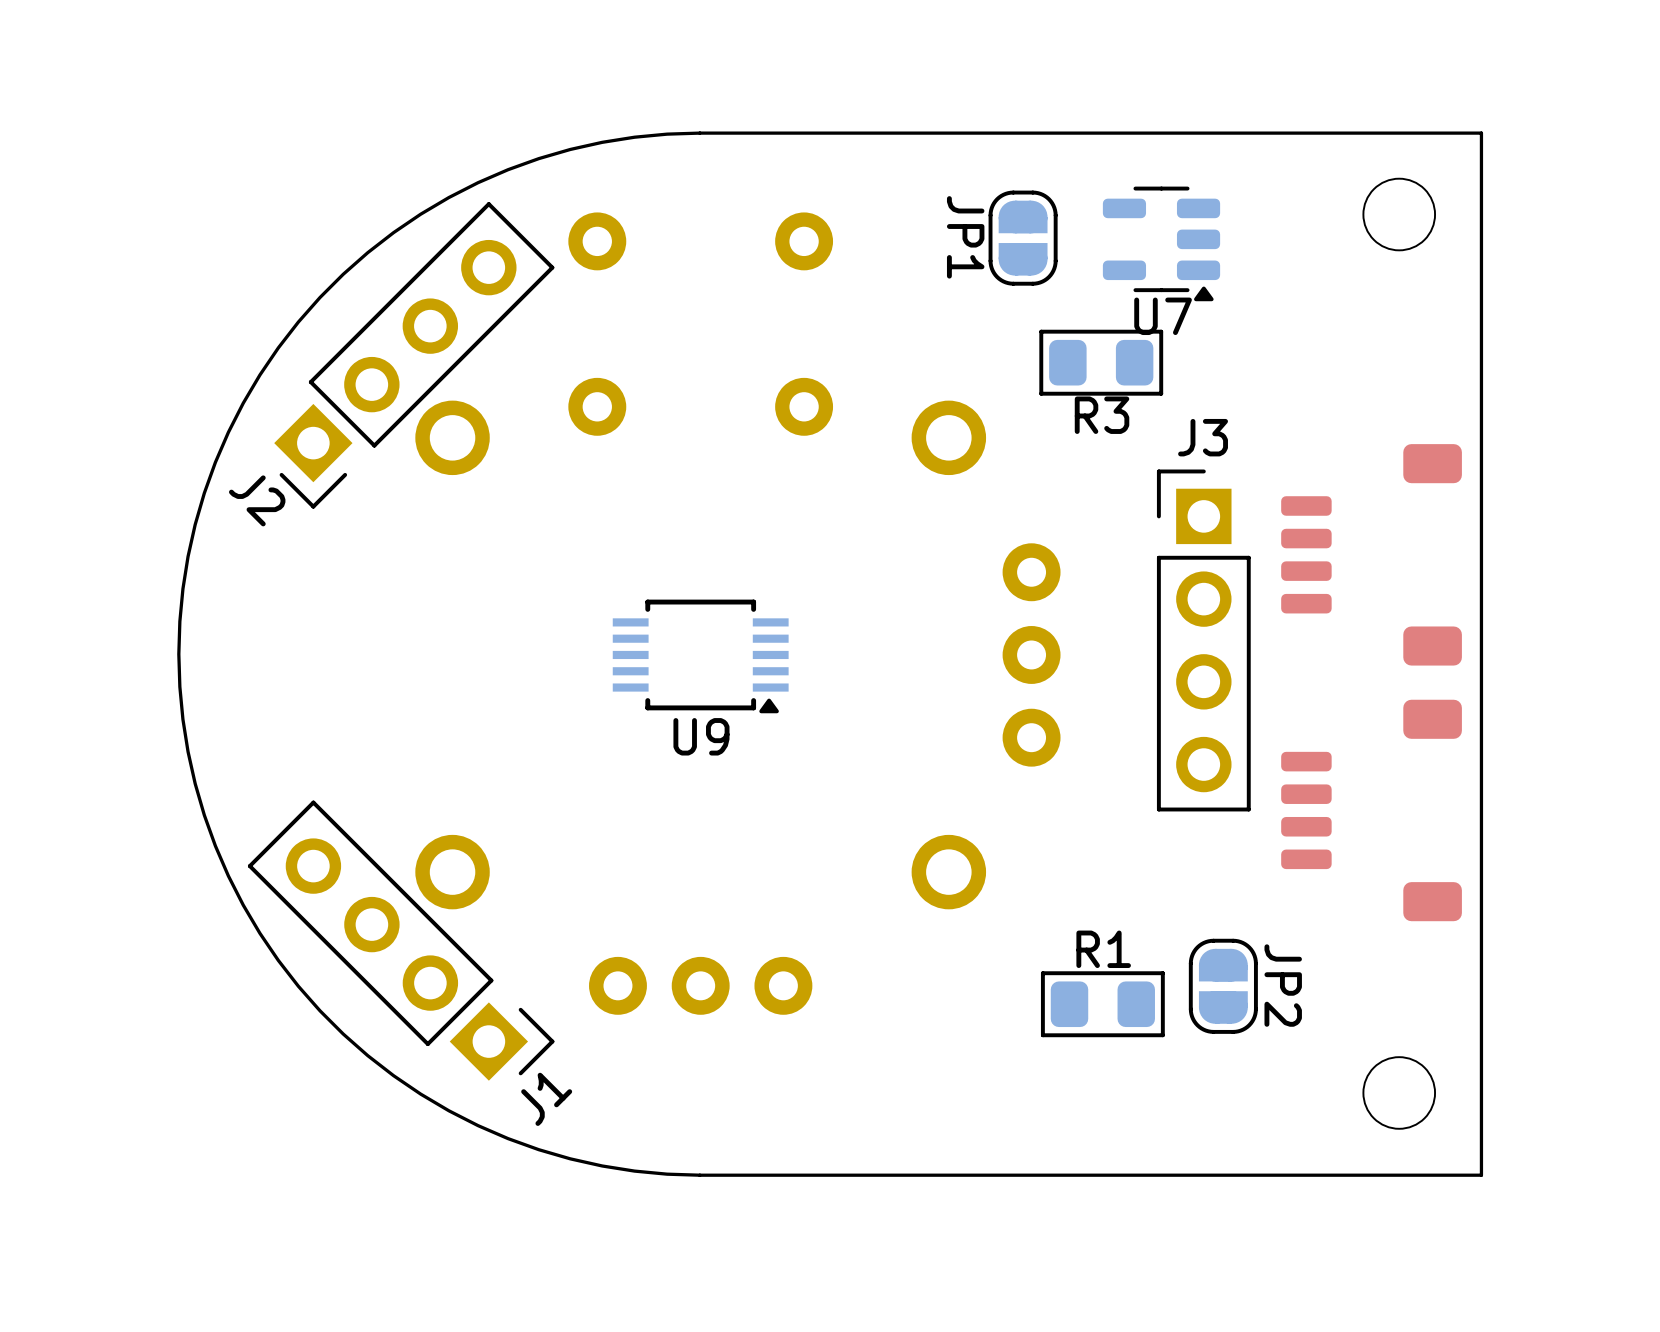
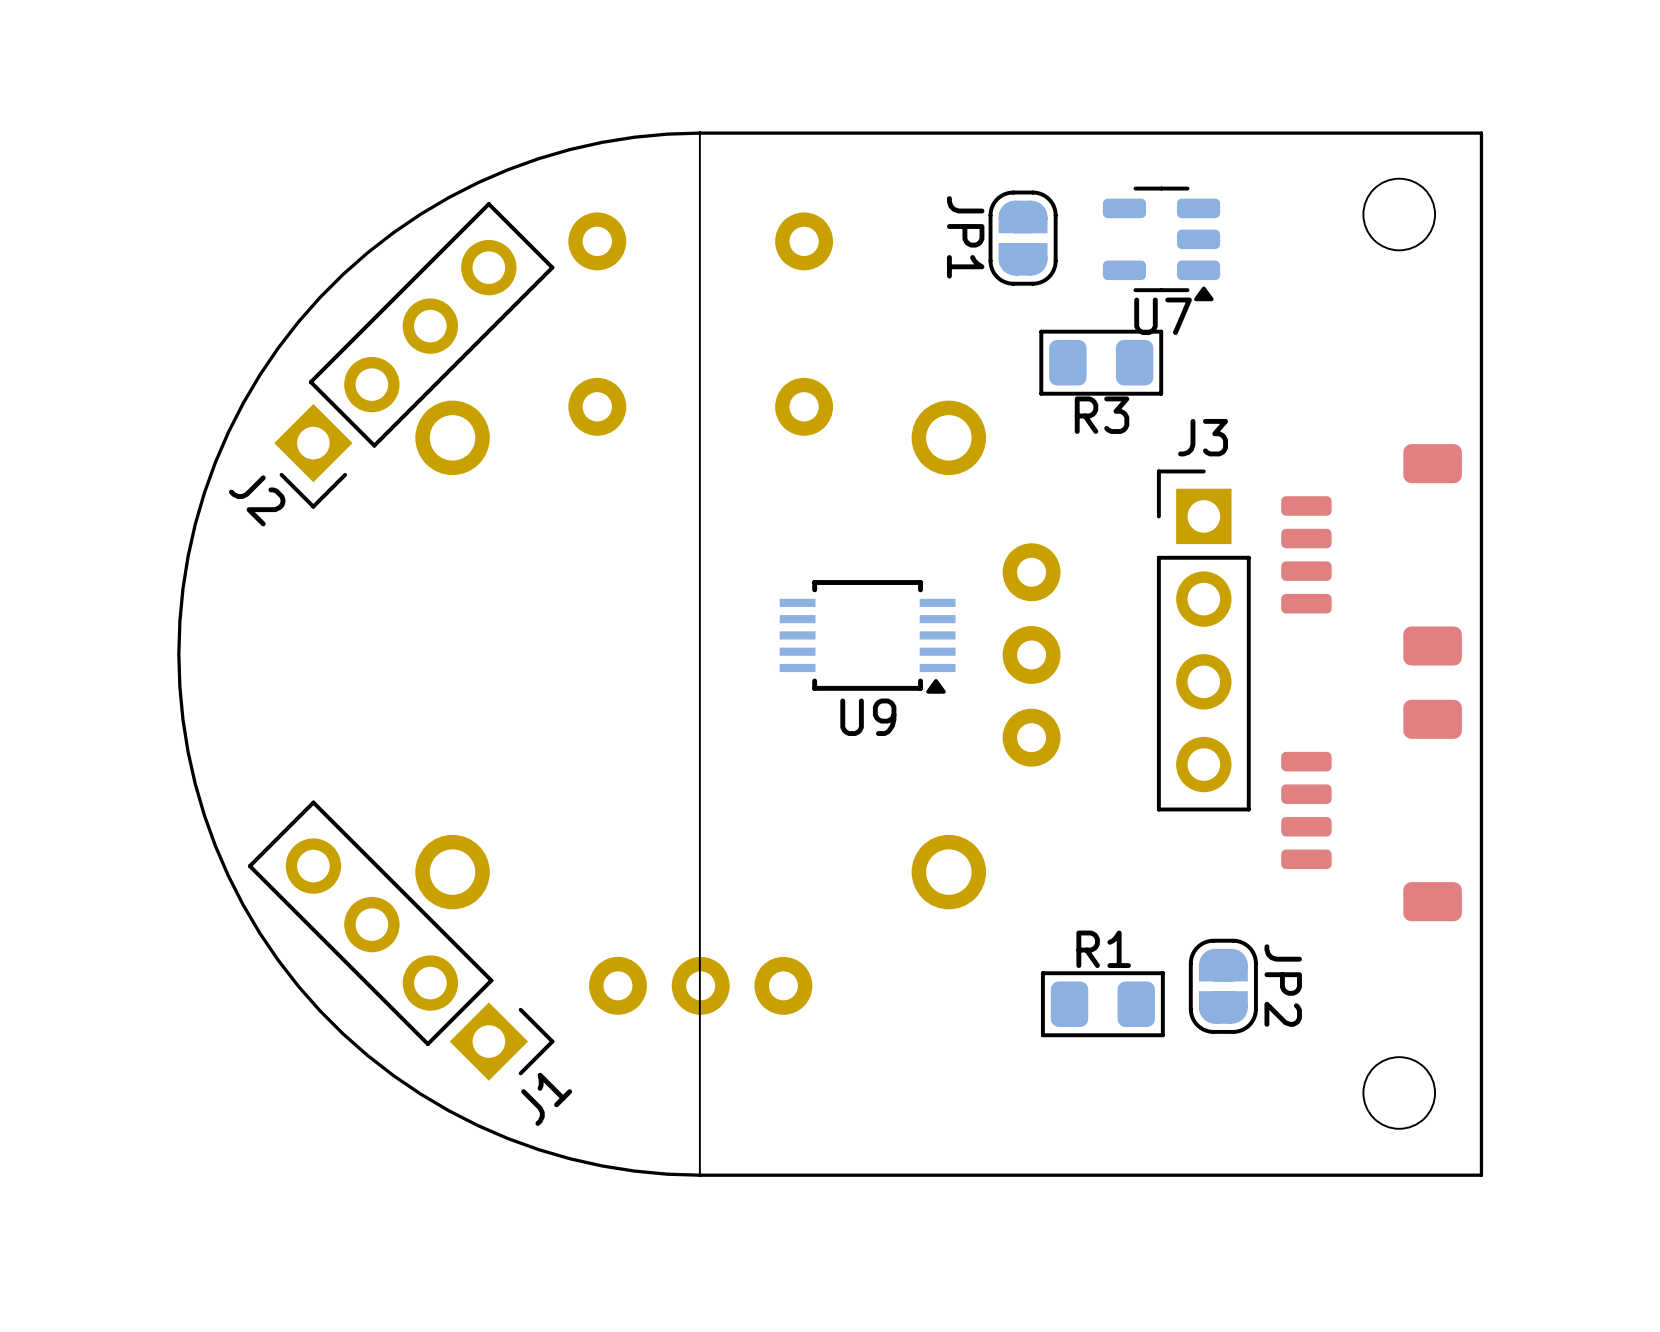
board edge: none -> (699, 133) (699, 1175)
U9 position: (700, 656) -> (867, 636)

